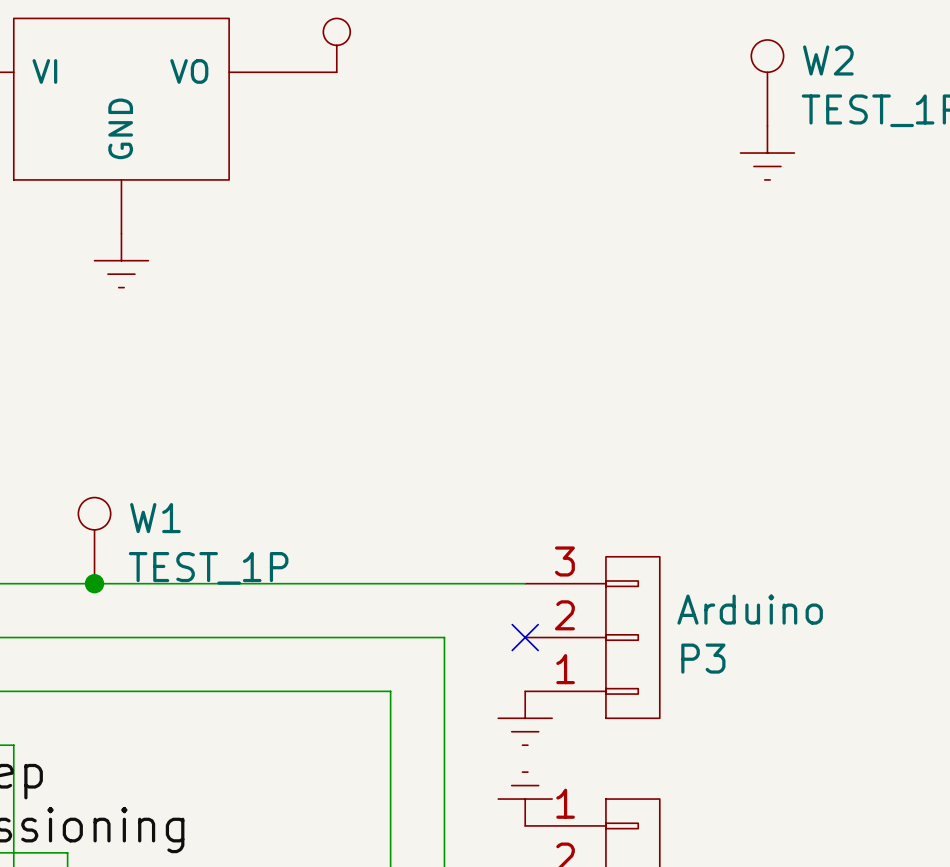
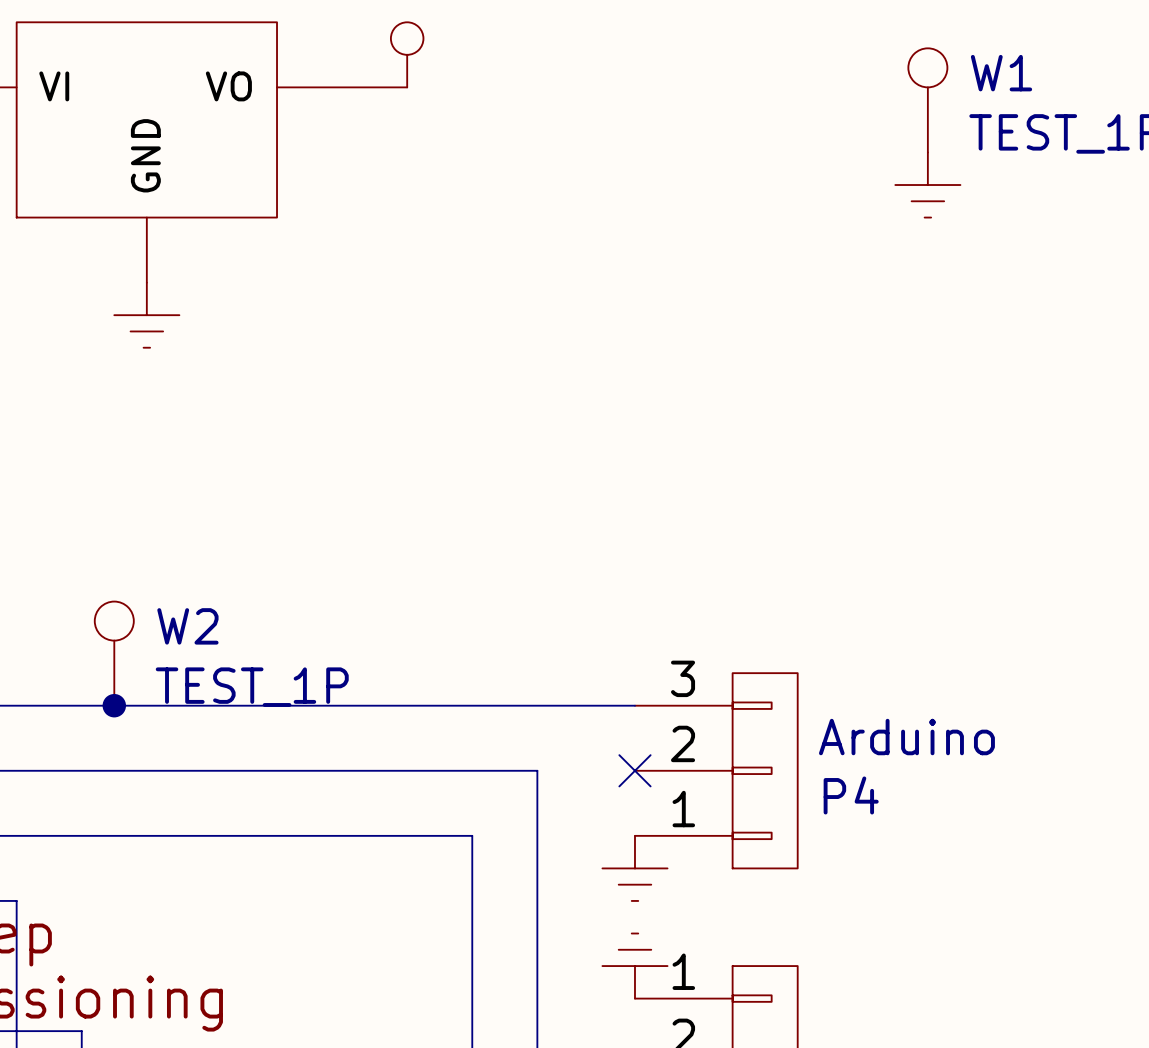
W2 name: W2 (828, 60) -> W1 (1001, 73)
W1 name: W1 (155, 518) -> W2 (187, 626)
P3 name: P3 (703, 658) -> P4 (851, 795)

